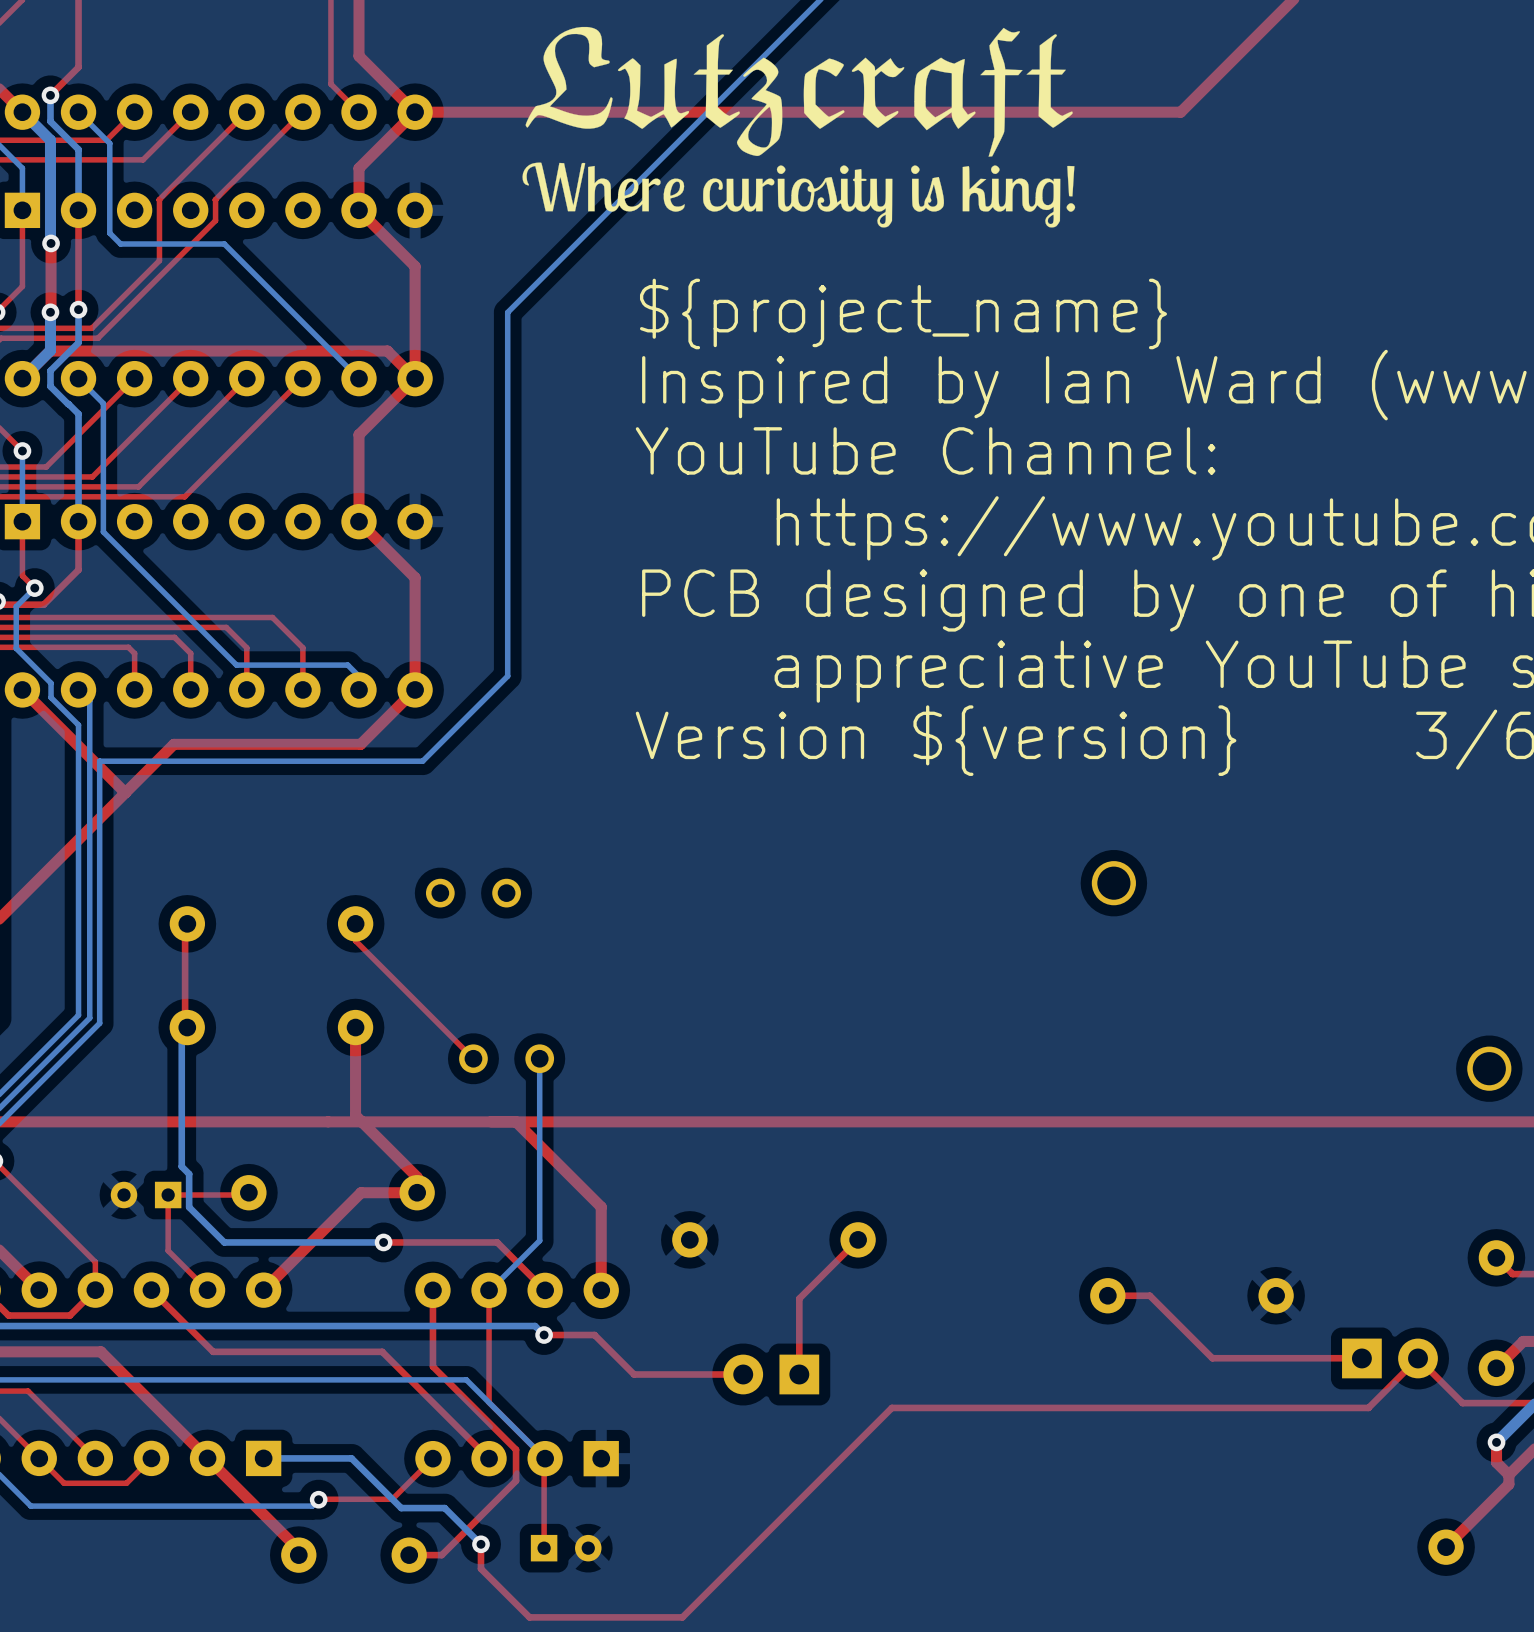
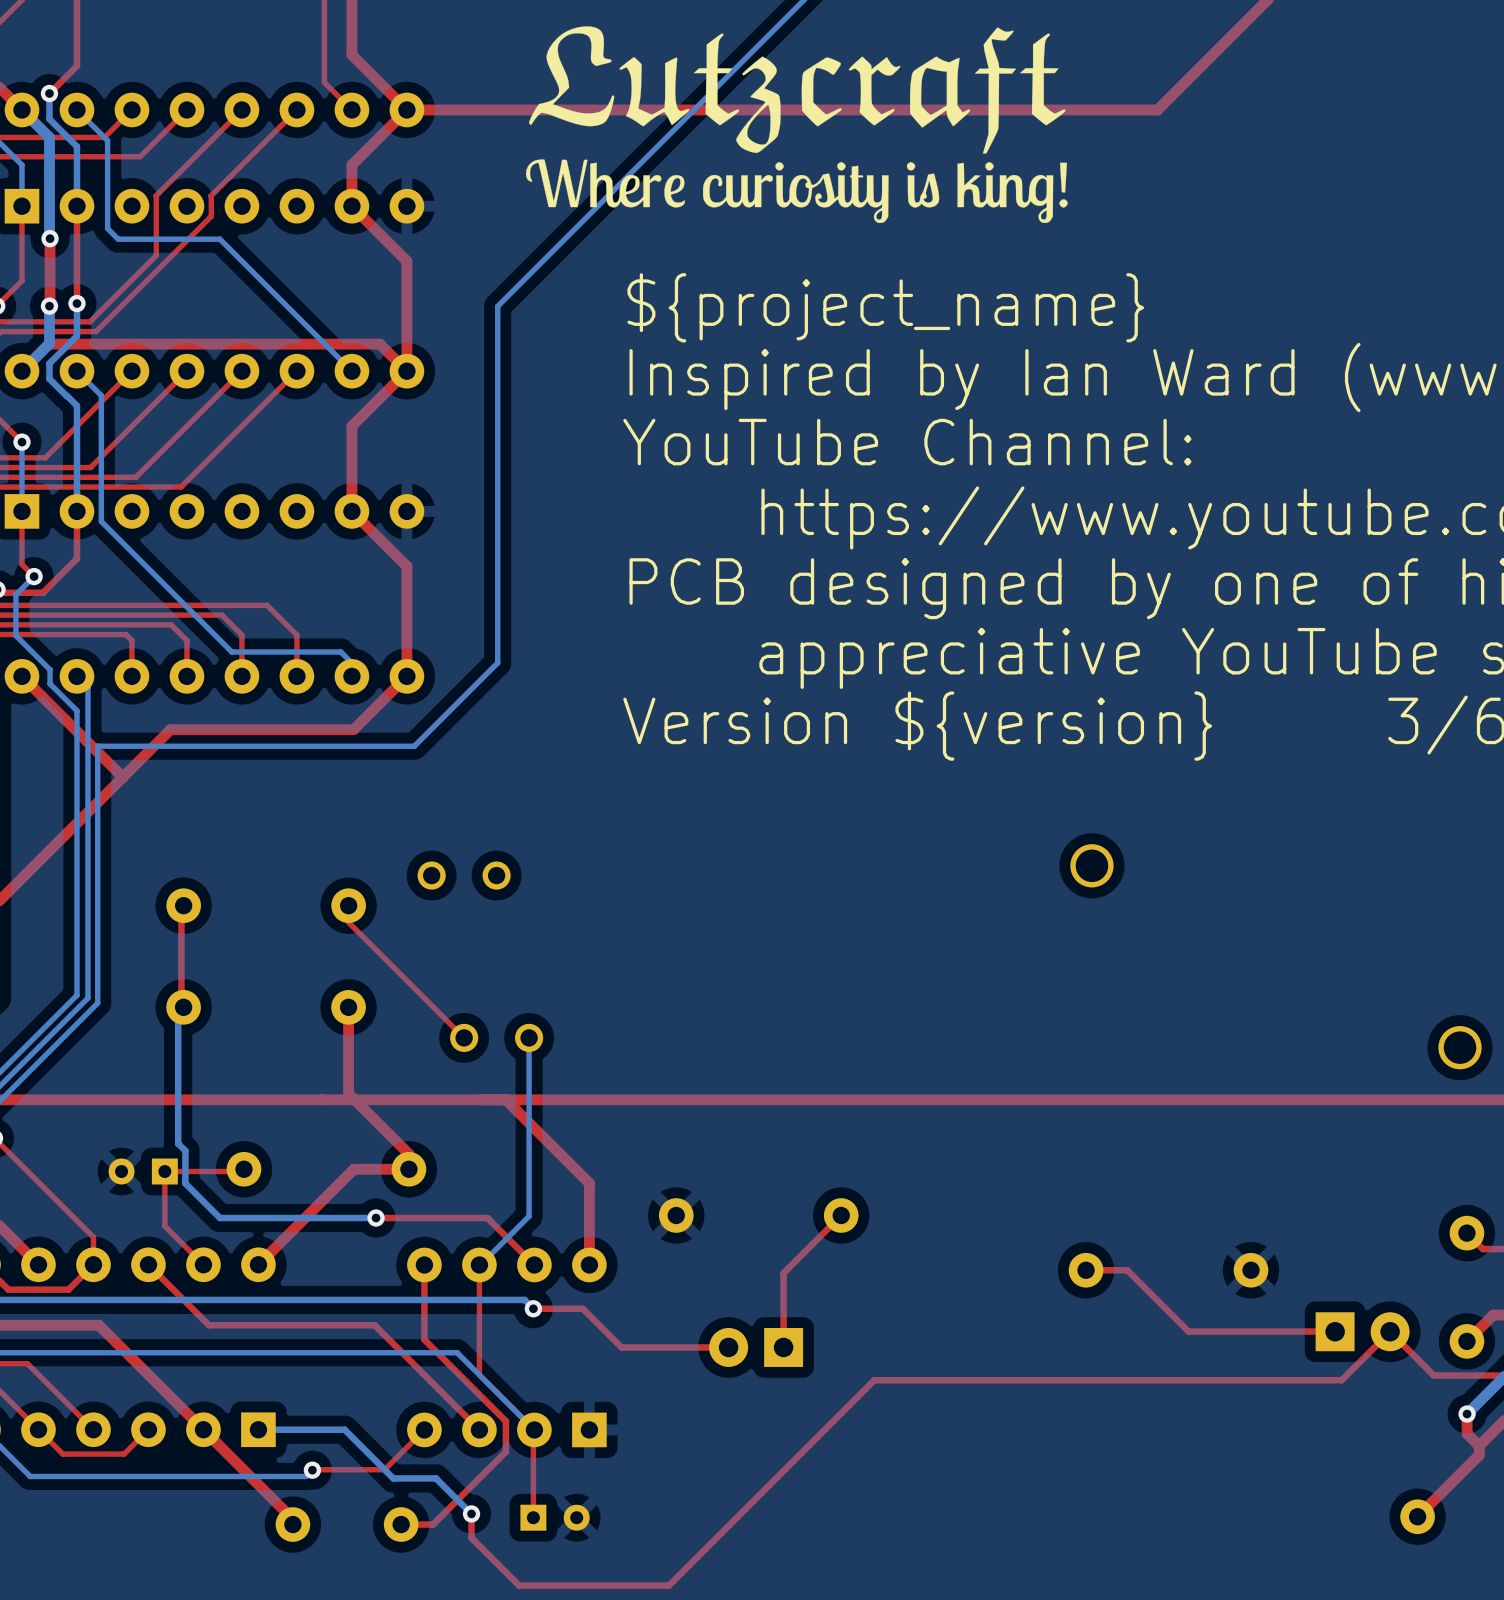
drawing position: (798, 127) -> (796, 124)

